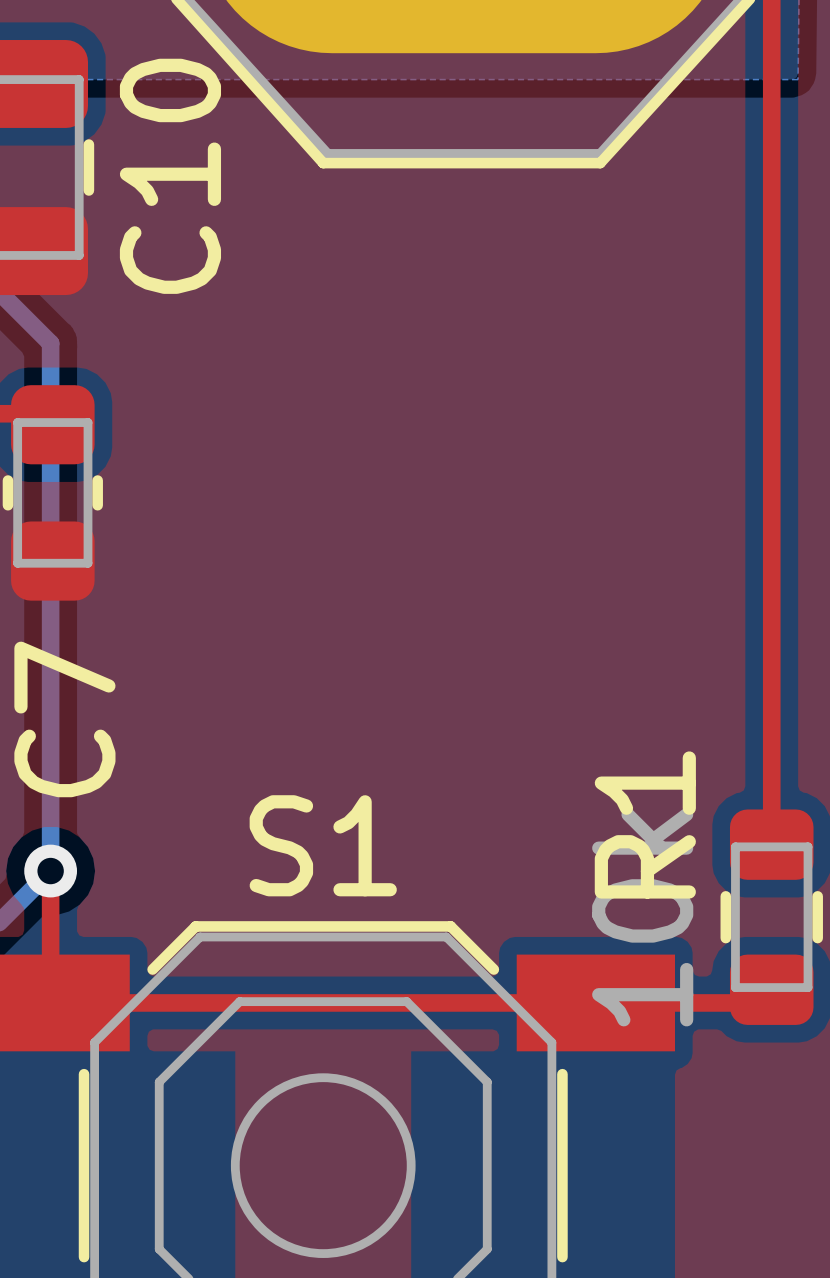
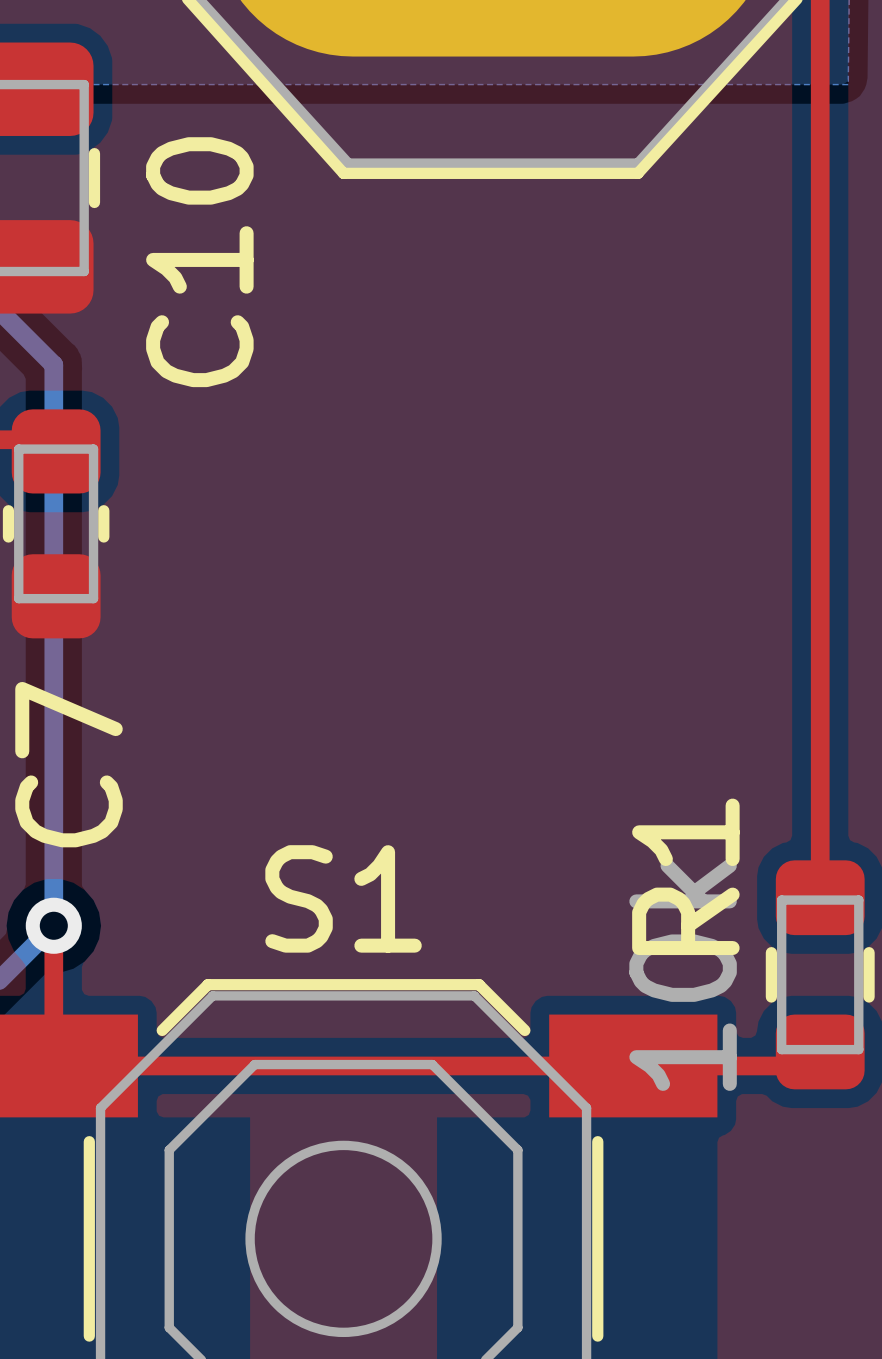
C10 name position: C10 (170, 176) -> C10 (199, 262)

